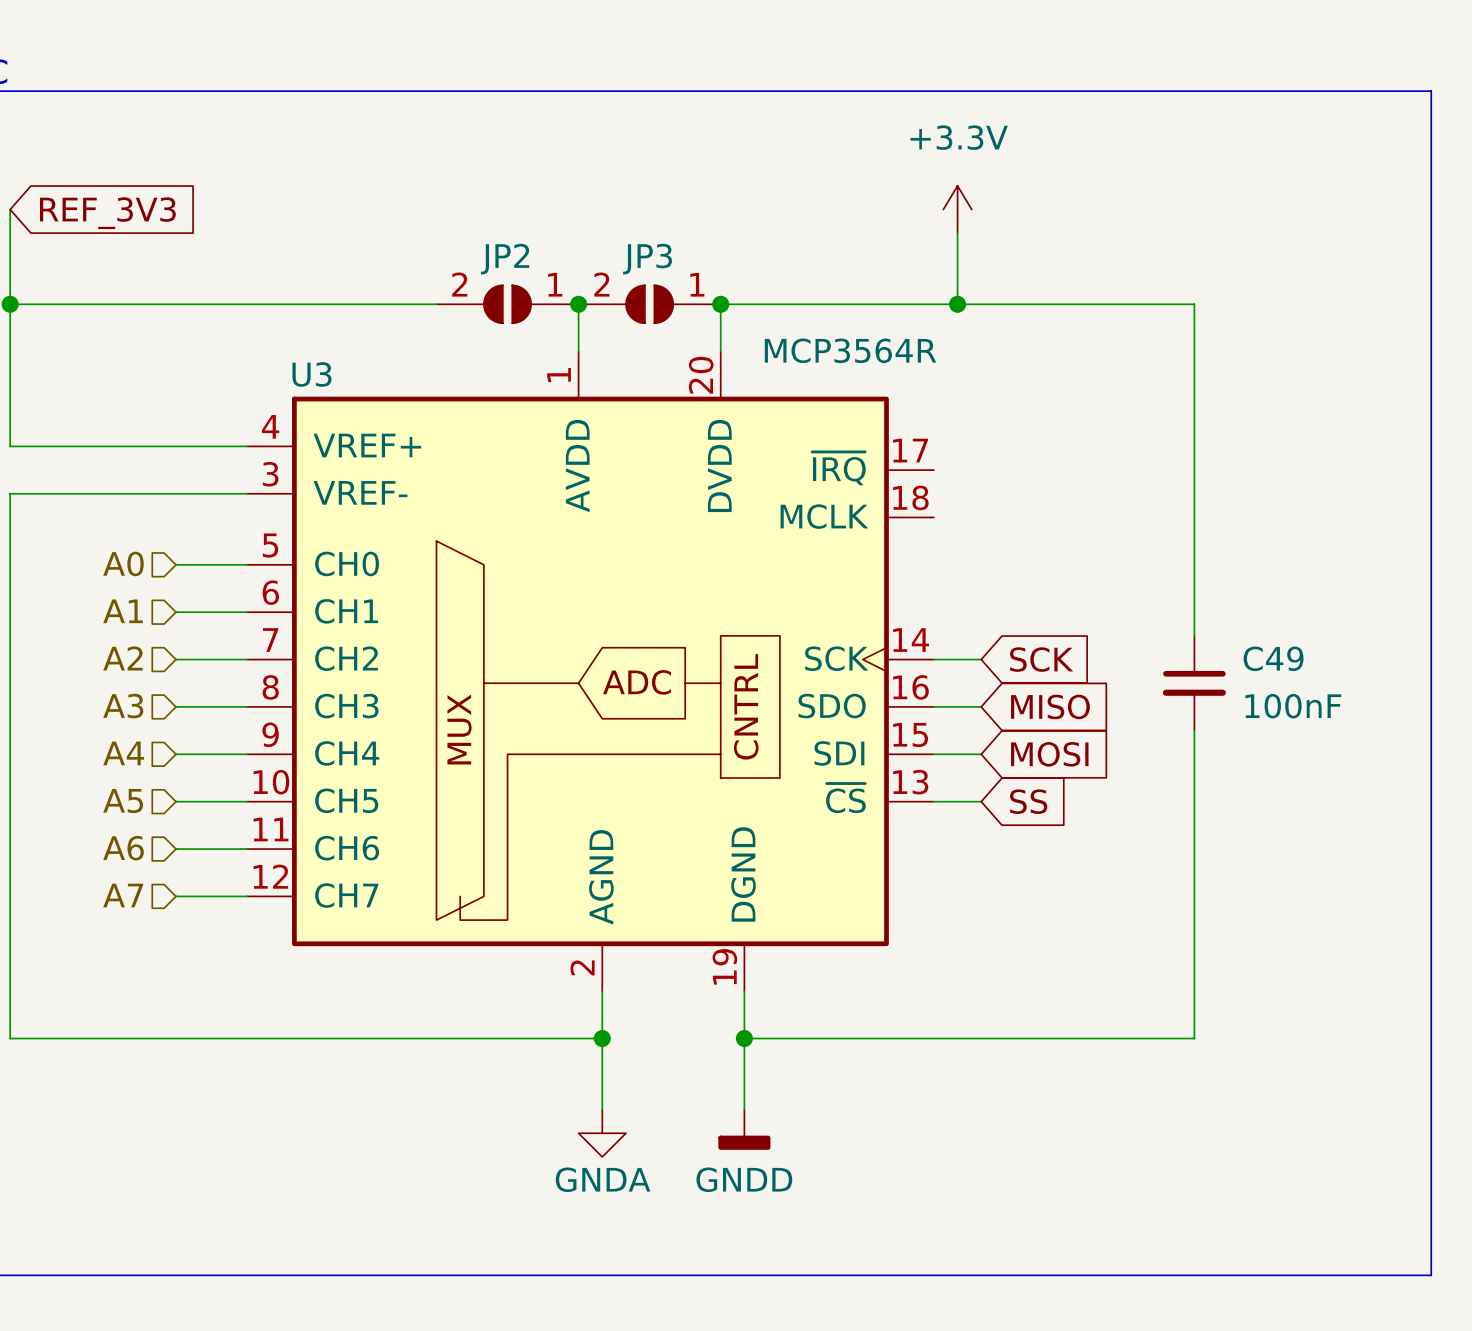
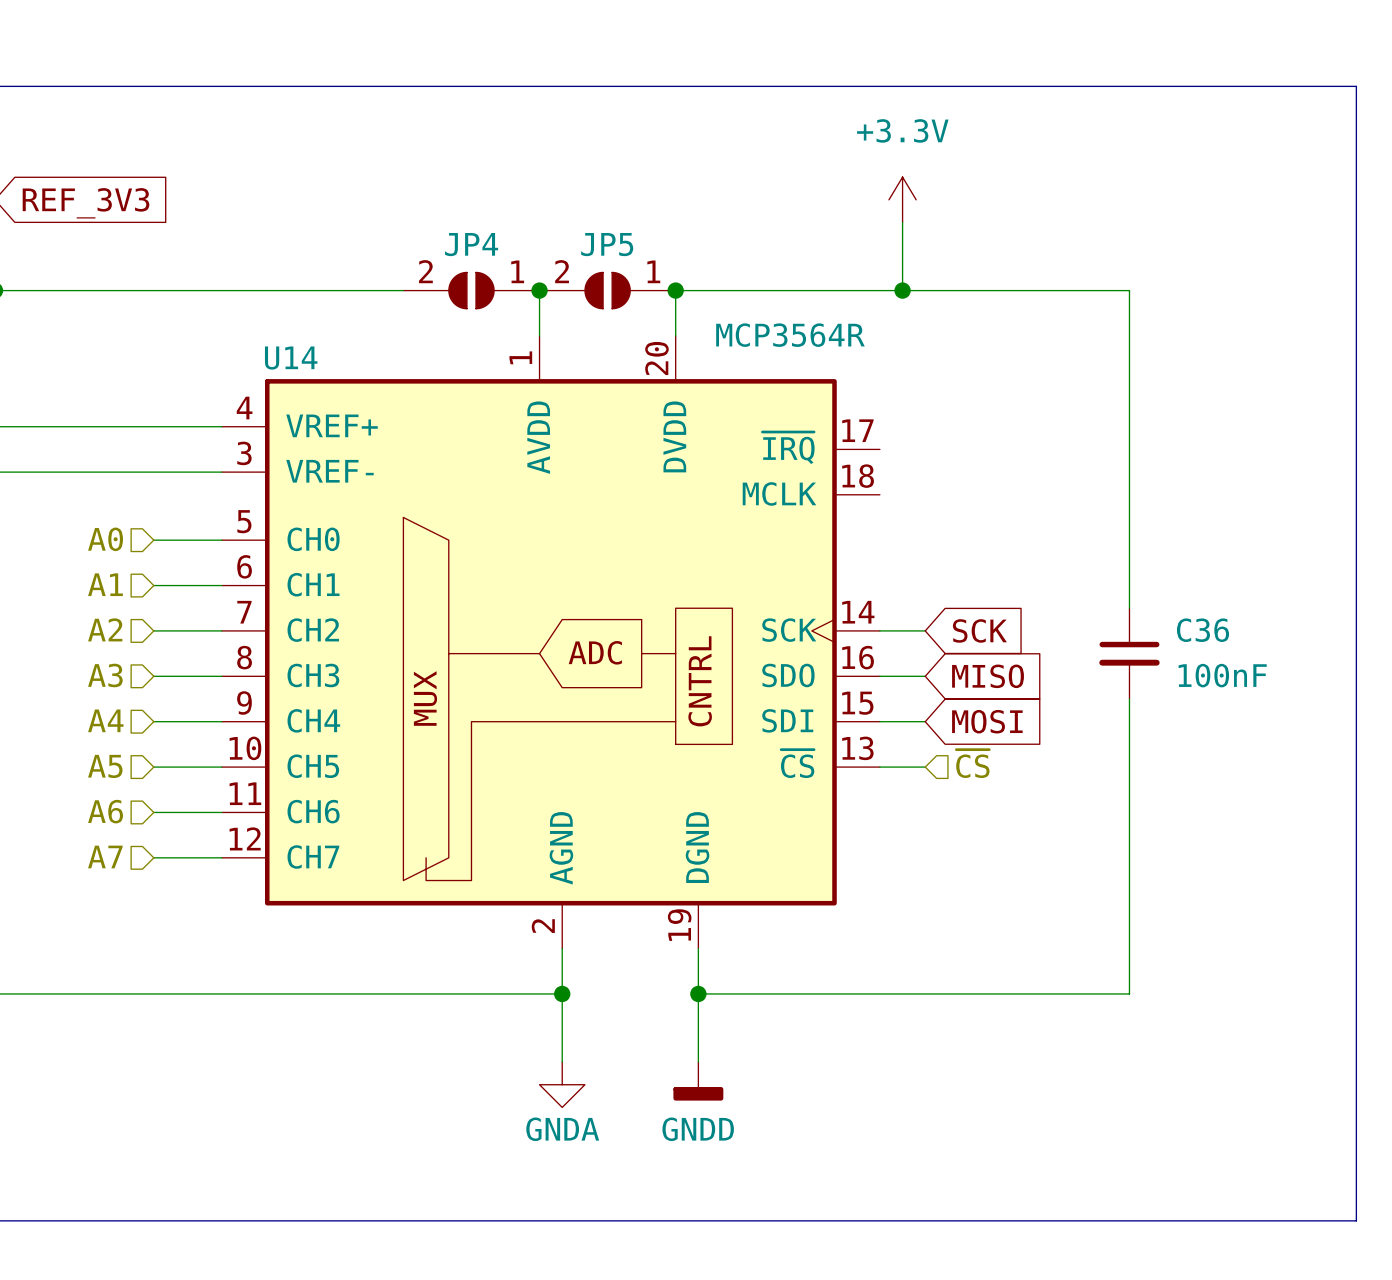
JP2 name: JP2 (505, 259) -> JP4 (471, 244)
JP3 name: JP3 (647, 259) -> JP5 (607, 244)
U3 name: U3 (311, 374) -> U14 (291, 358)
C49 name: C49 (1273, 658) -> C36 (1203, 630)
hierarchical label: none -> ~{CS} (972, 763)
global label: SS (1028, 801) -> none

